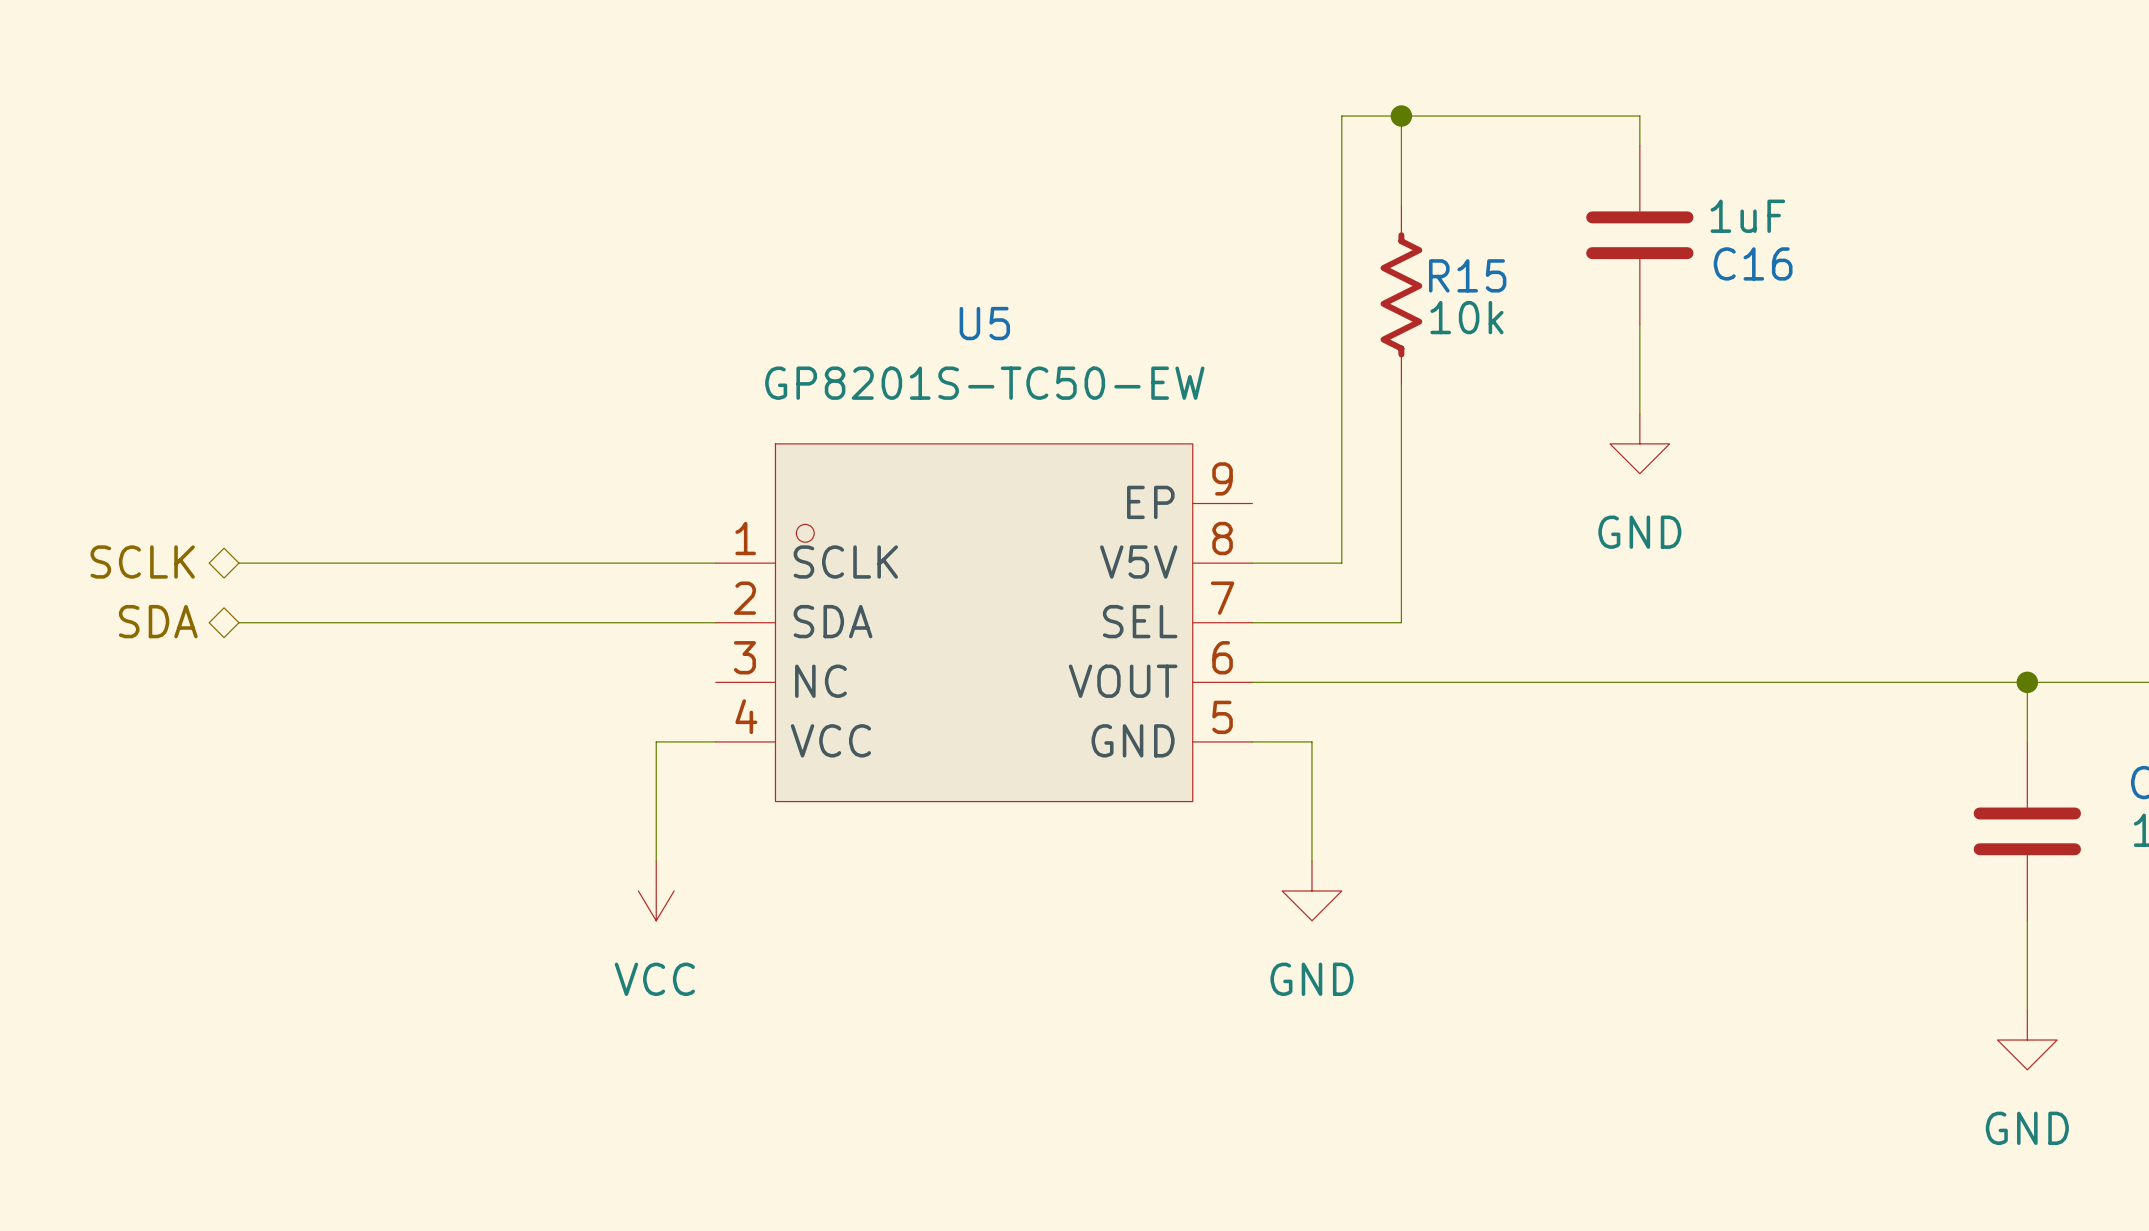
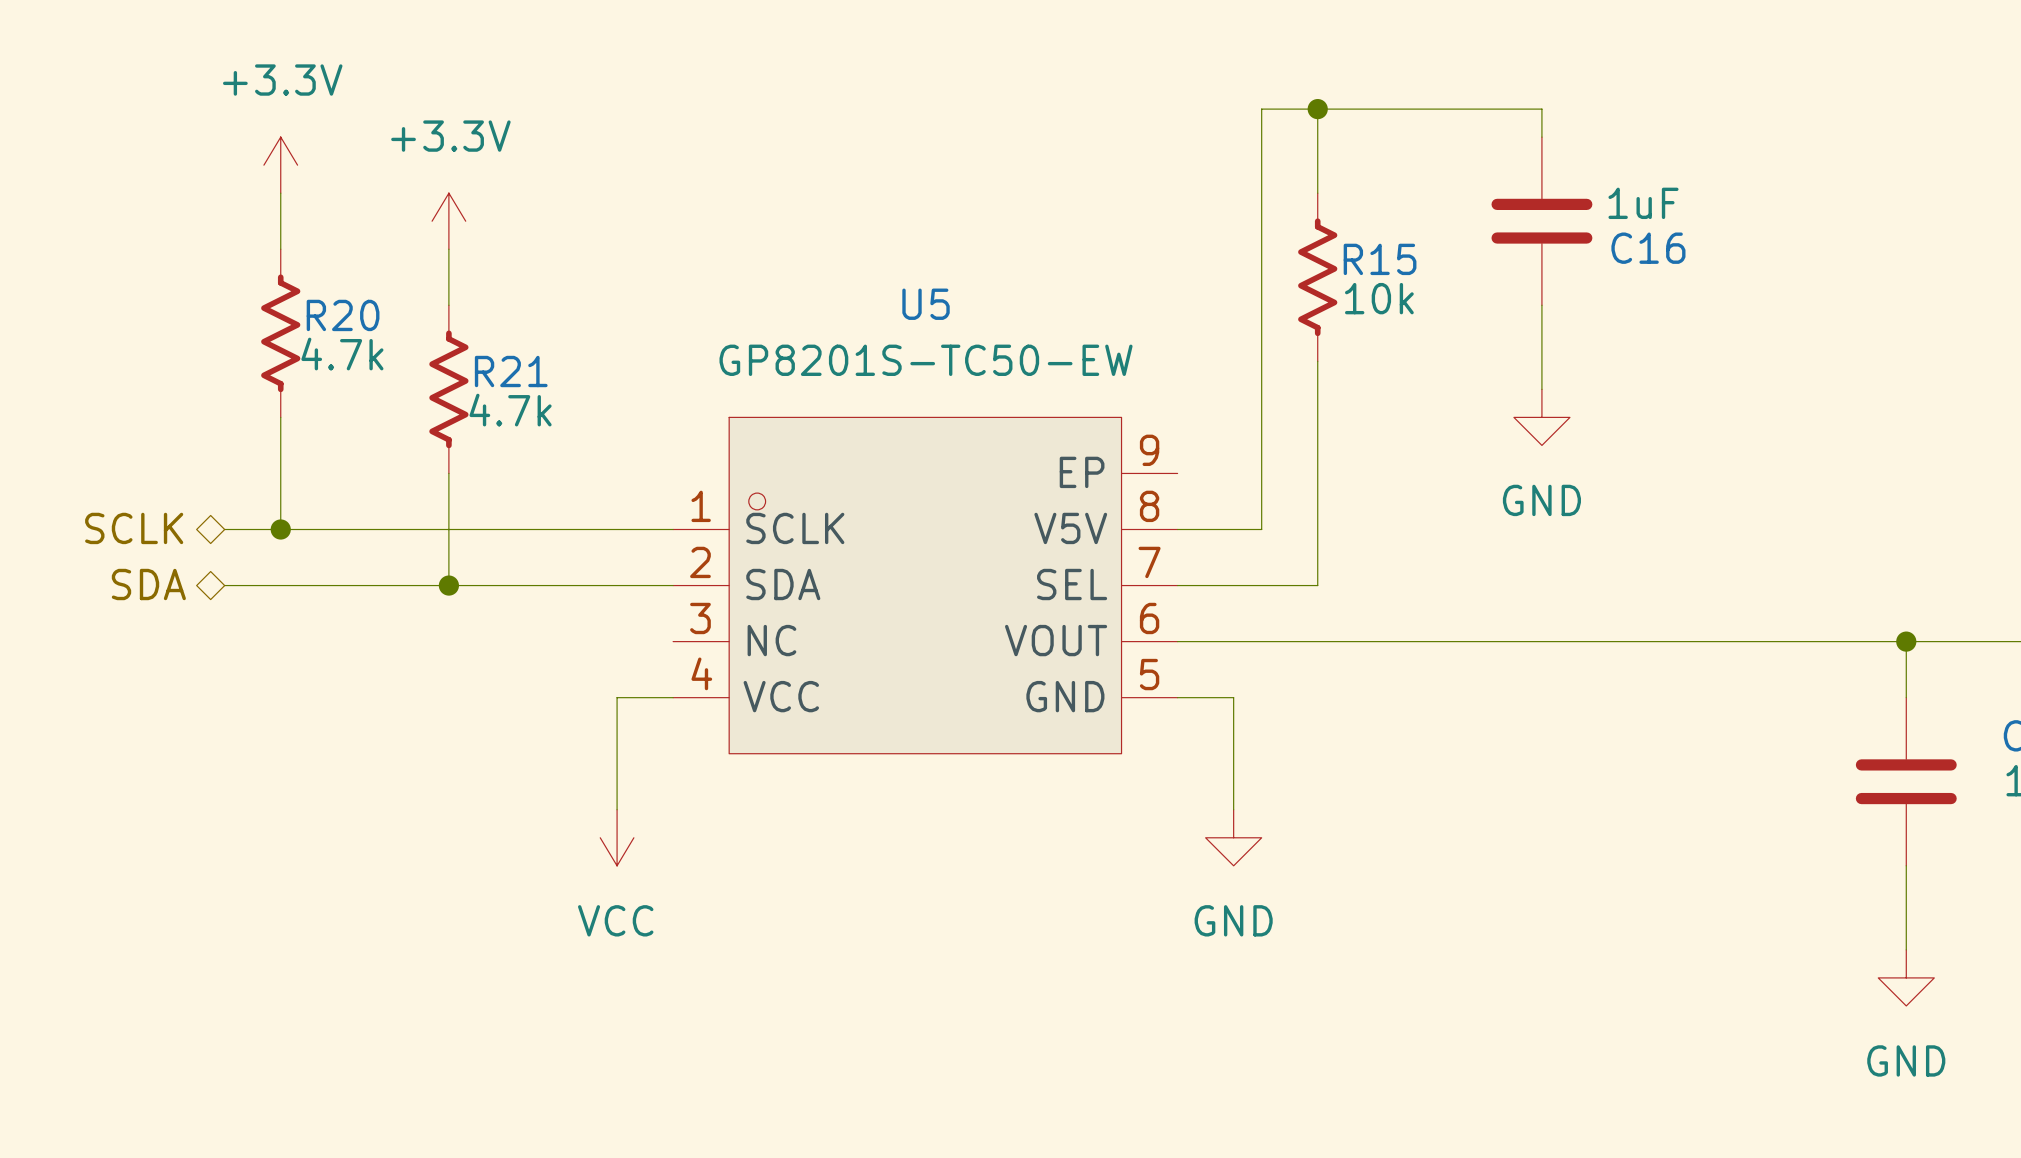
power symbol: none -> +3.3V (280, 165)
wire: none -> (280, 193) (280, 249)
power symbol: none -> +3.3V (448, 221)
wire: none -> (448, 249) (448, 305)
R20: none -> (280, 333)
R21: none -> (448, 389)
wire: none -> (280, 417) (280, 529)
wire: none -> (448, 473) (448, 585)
junction: none -> (280, 529)
junction: none -> (448, 585)

